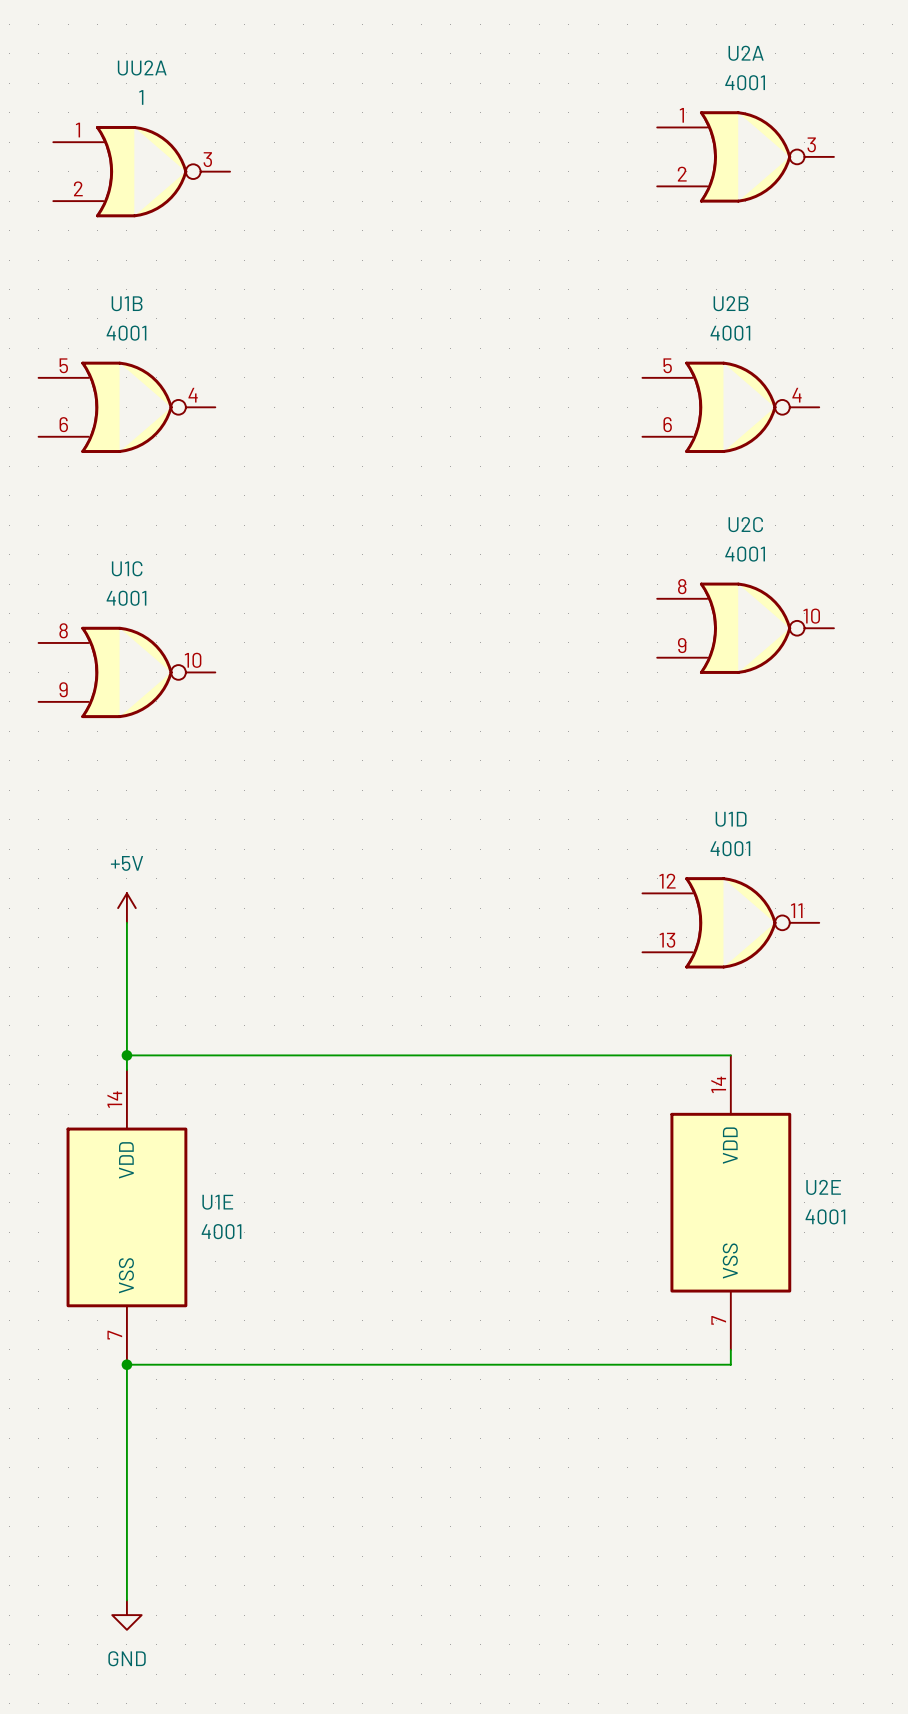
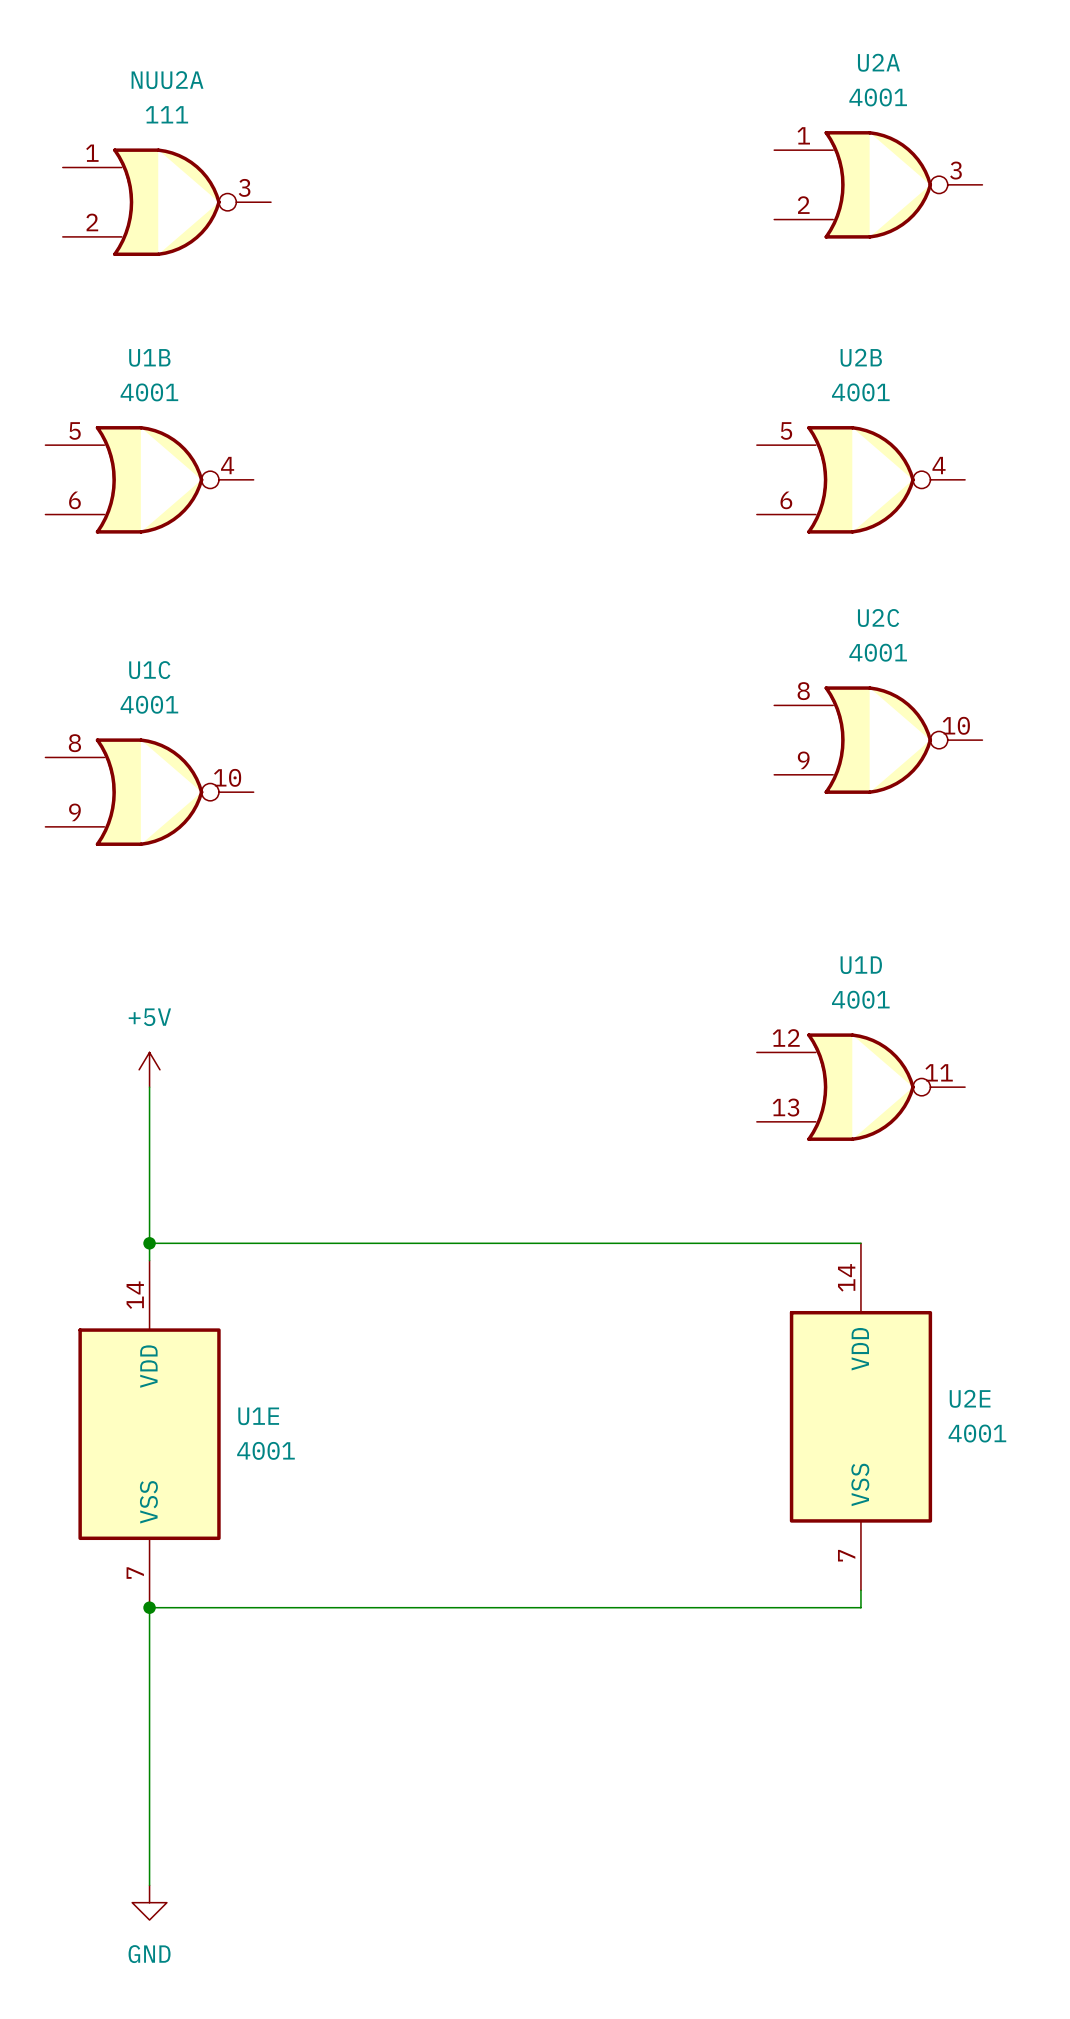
UU2A name: UU2A (142, 67) -> NUU2A (167, 80)
UU2A value: 1 (141, 97) -> 111 (166, 114)

